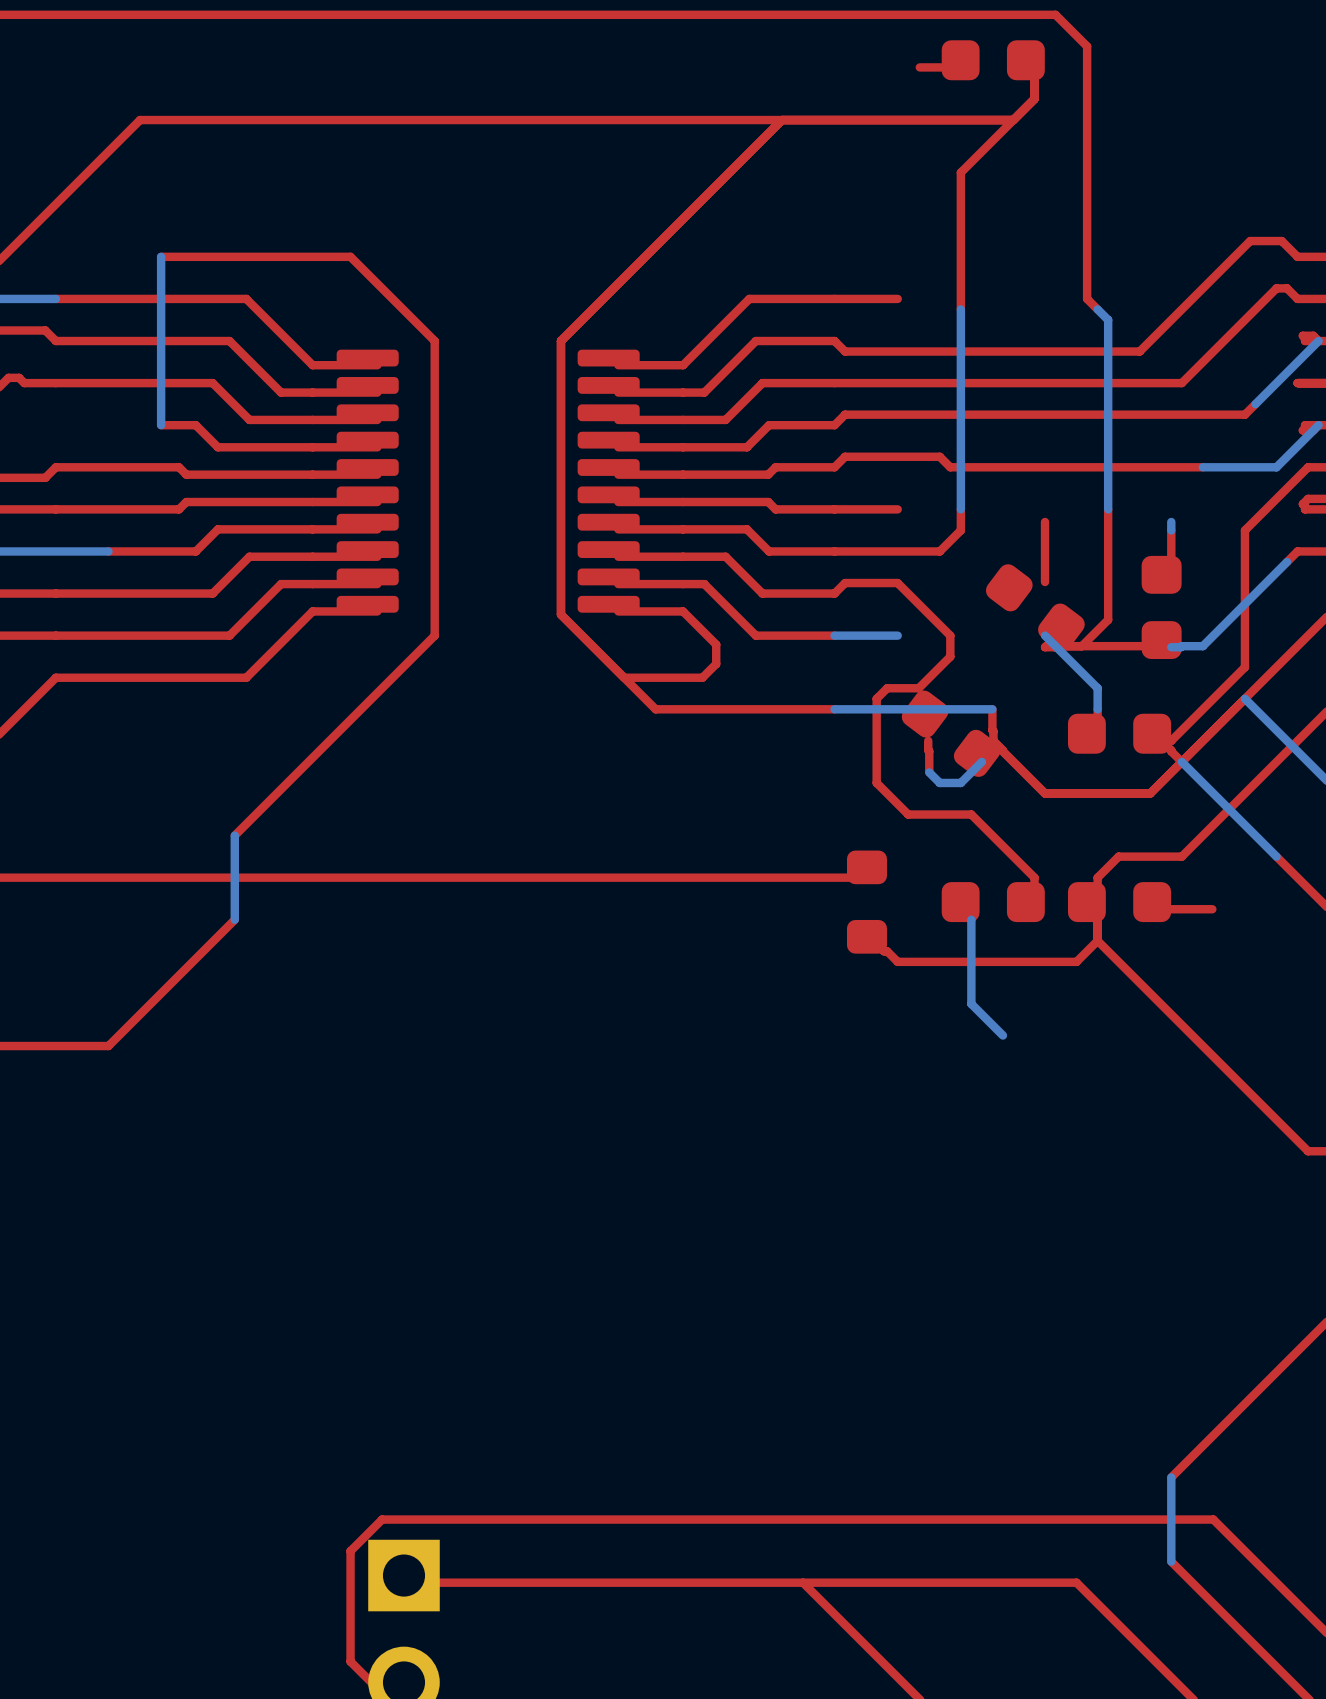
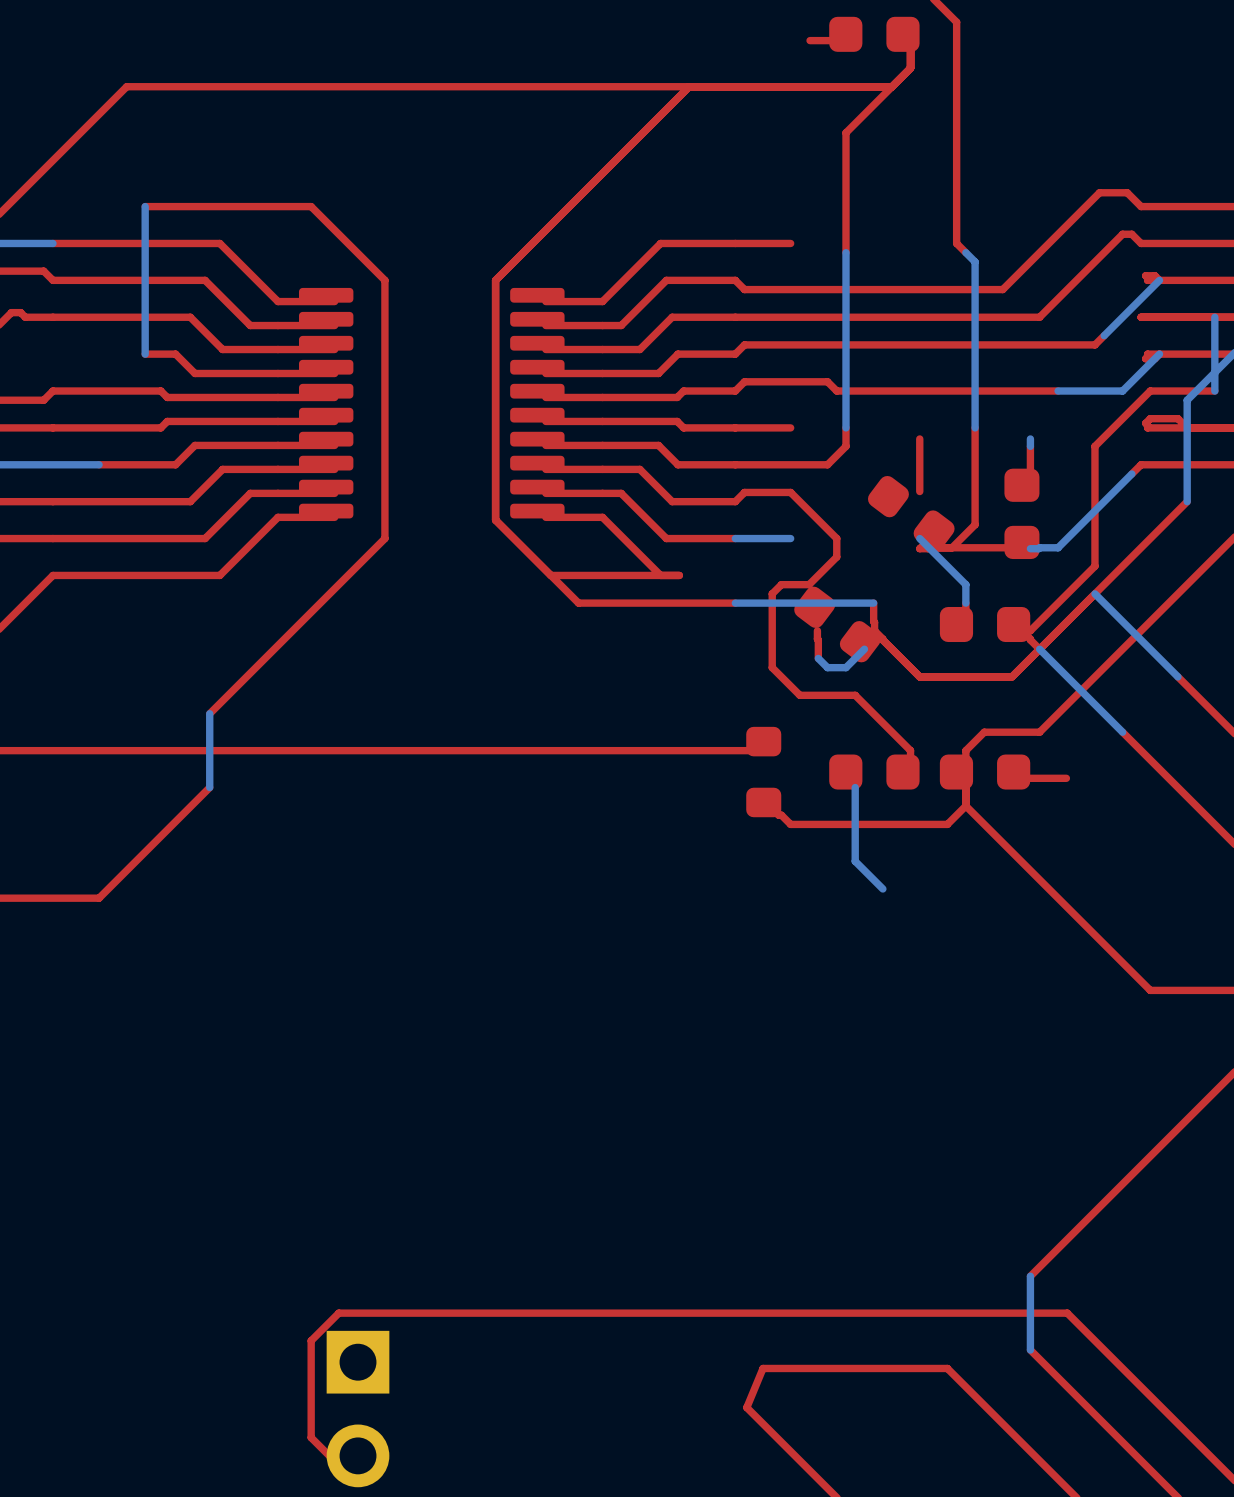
top track: (683, 611) (716, 644) (716, 663) (702, 677) -> (602, 517) (660, 575)
top track: none -> (679, 575) (619, 575)
top track: (803, 1582) (847, 1627) -> (763, 1368) (746, 1407)
top track: (866, 1582) (413, 1582) -> none

